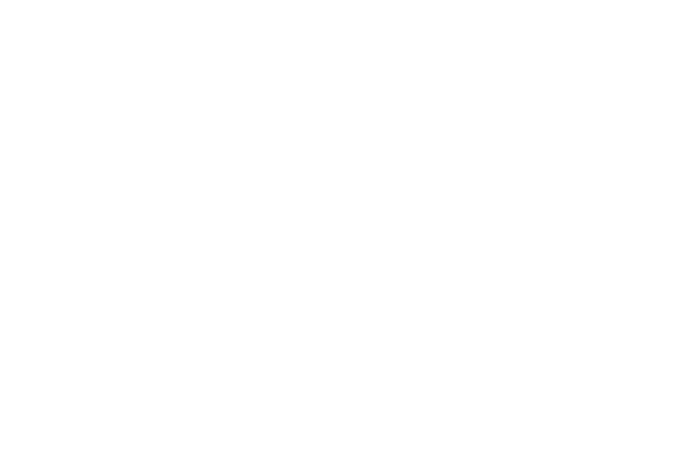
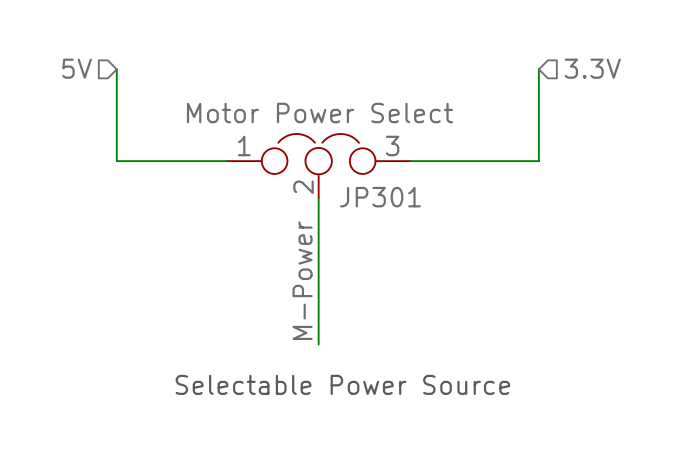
hierarchical label: none -> 5V (77, 68)
hierarchical label: none -> 3.3V (592, 68)
wire: none -> (116, 69) (116, 161) (226, 161)
wire: none -> (538, 69) (538, 161) (410, 161)
JP301: none -> Motor Power Select (318, 165)
wire: none -> (318, 197) (318, 344)
label: none -> M-Power (302, 280)
text: none -> Selectable Power Source (342, 384)

